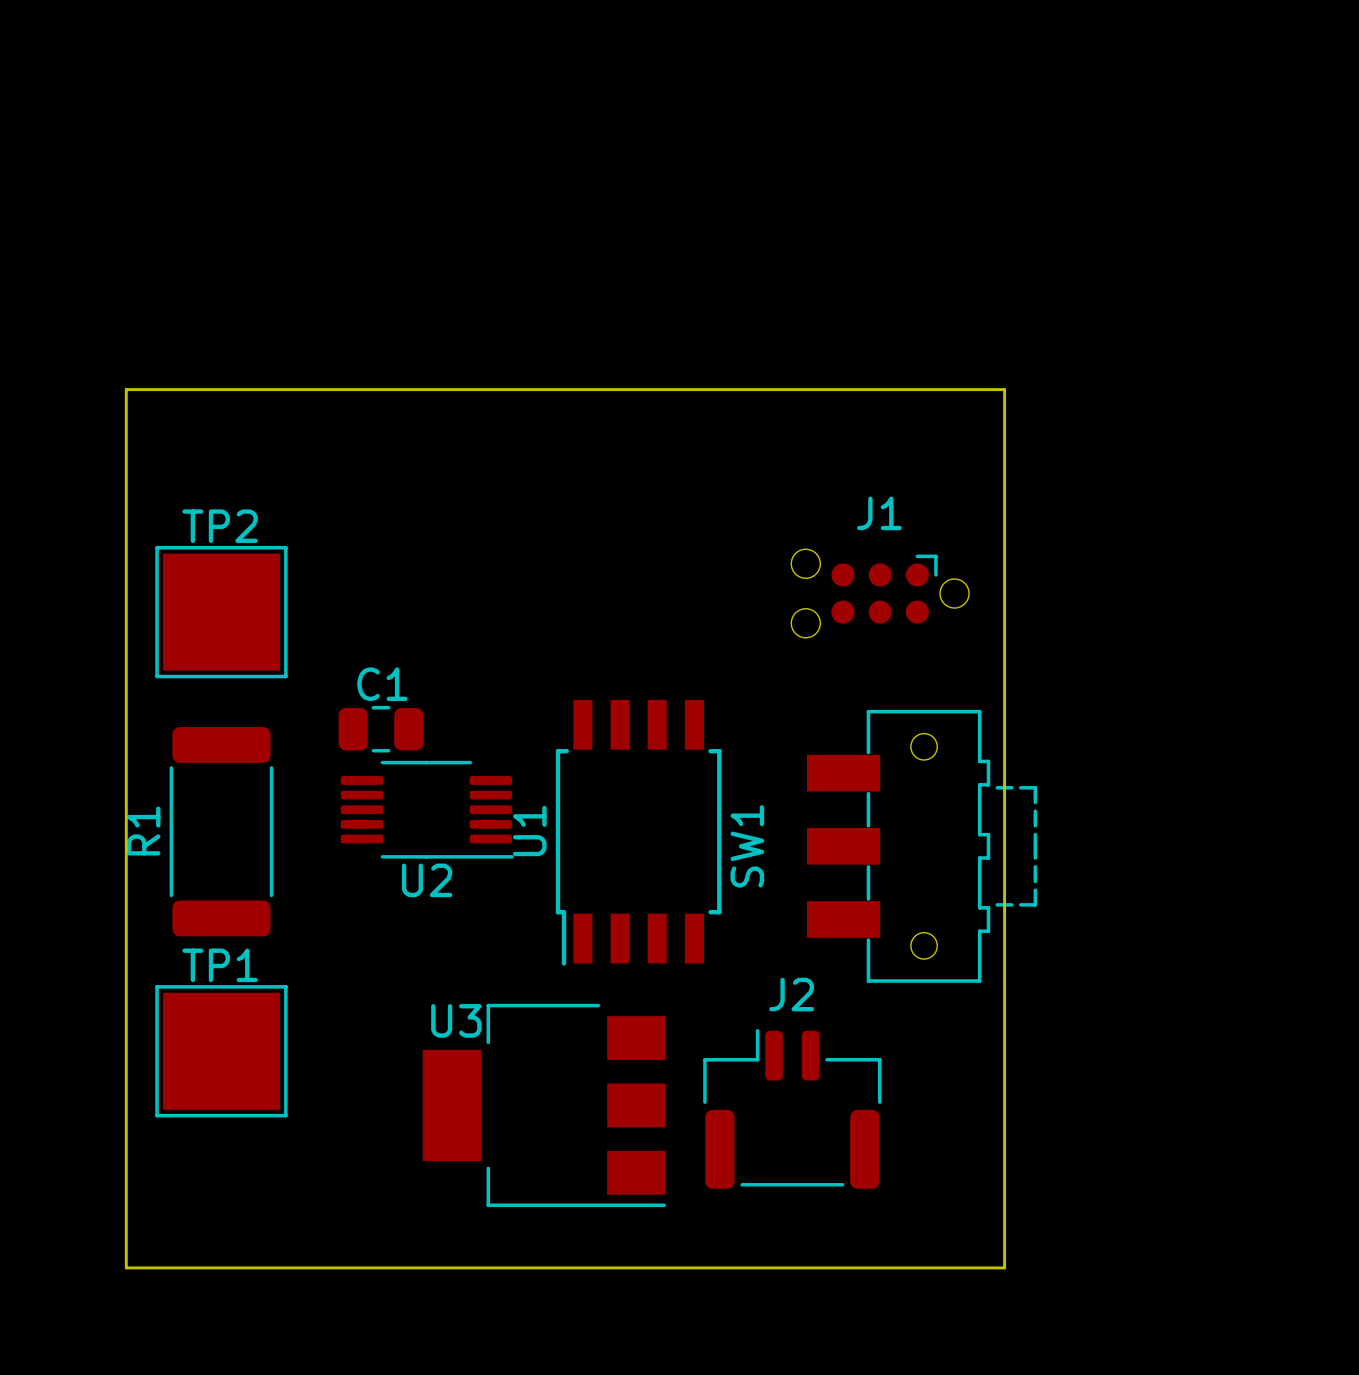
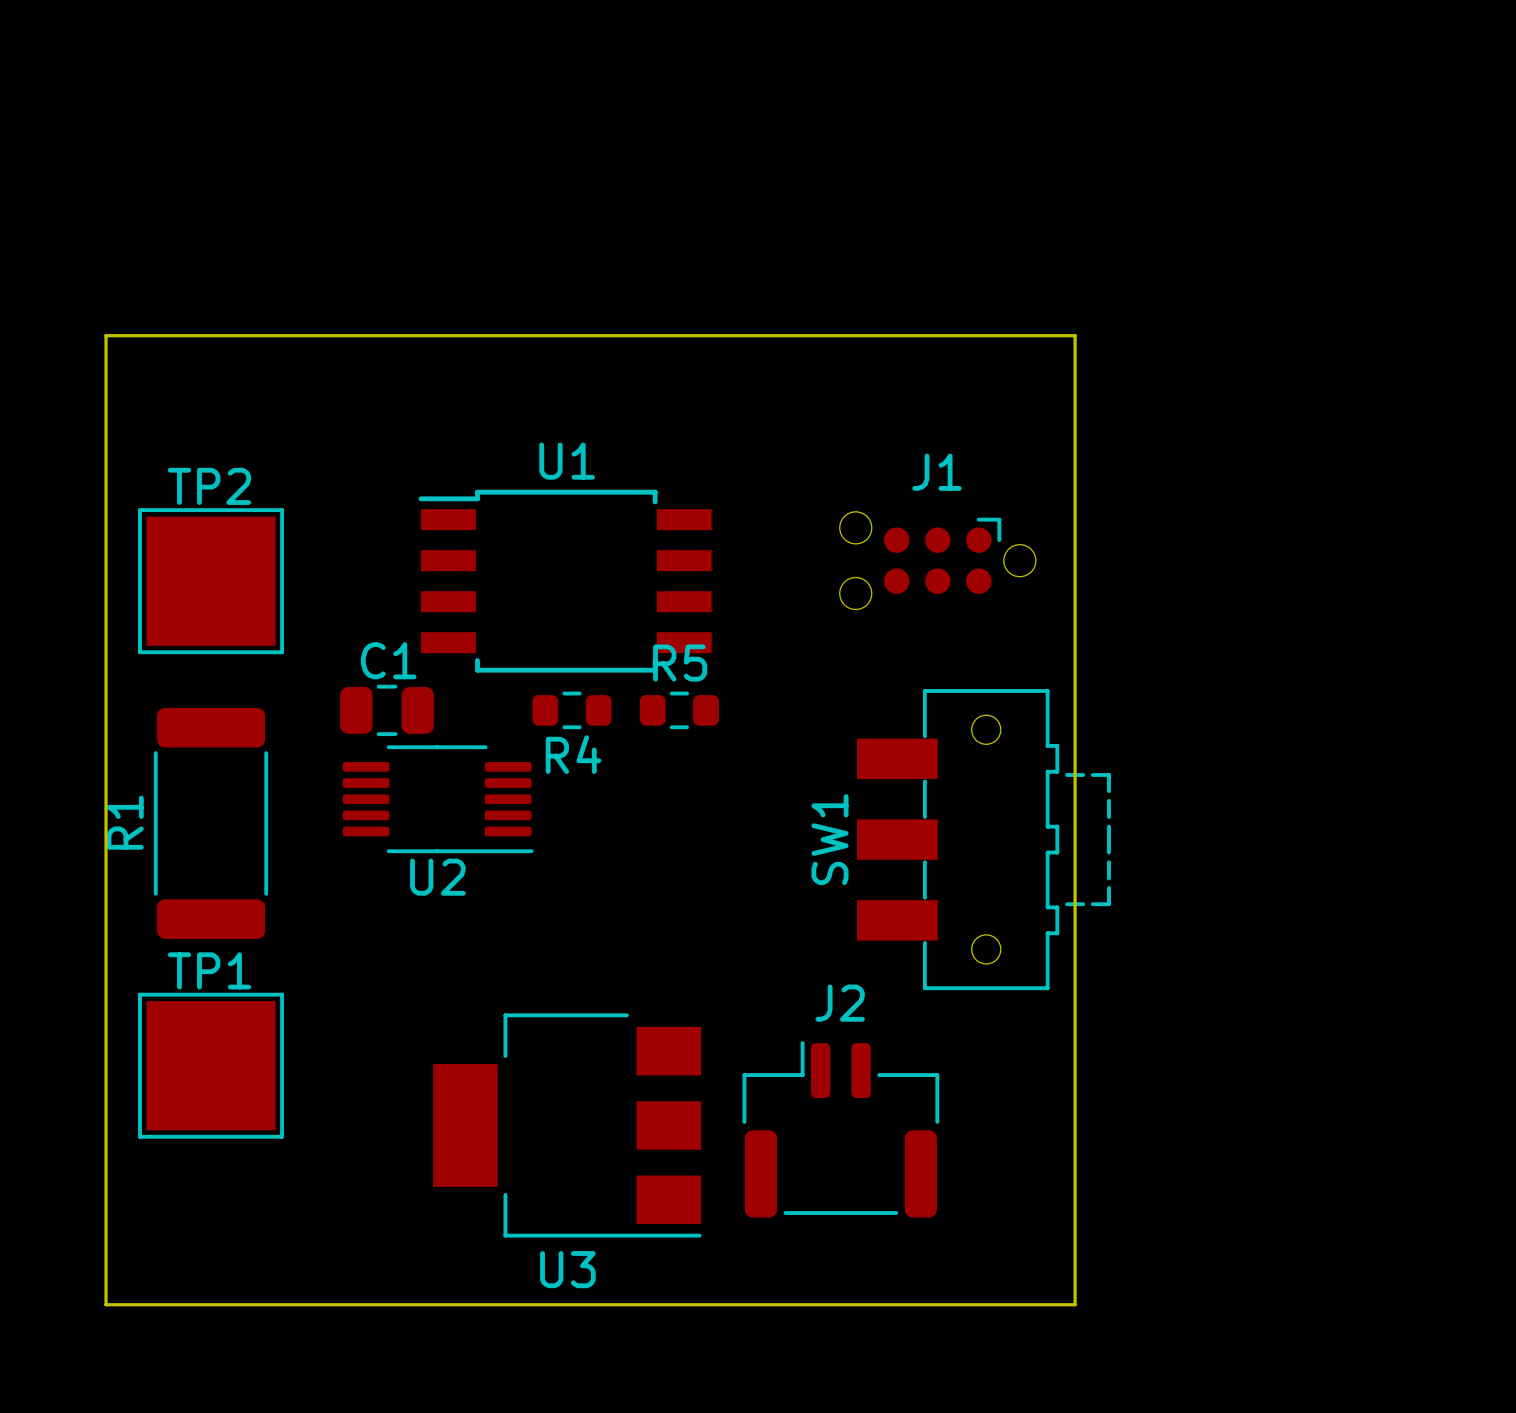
R4: none -> (571, 710)
R5: none -> (679, 710)
U1 rotation: 0° (638, 832) -> 90° clockwise (565, 581)
U1 position: (638, 832) -> (565, 581)
SW1 name position: SW1 (747, 846) -> SW1 (829, 839)
U3 name position: U3 (456, 1020) -> U3 (567, 1269)

